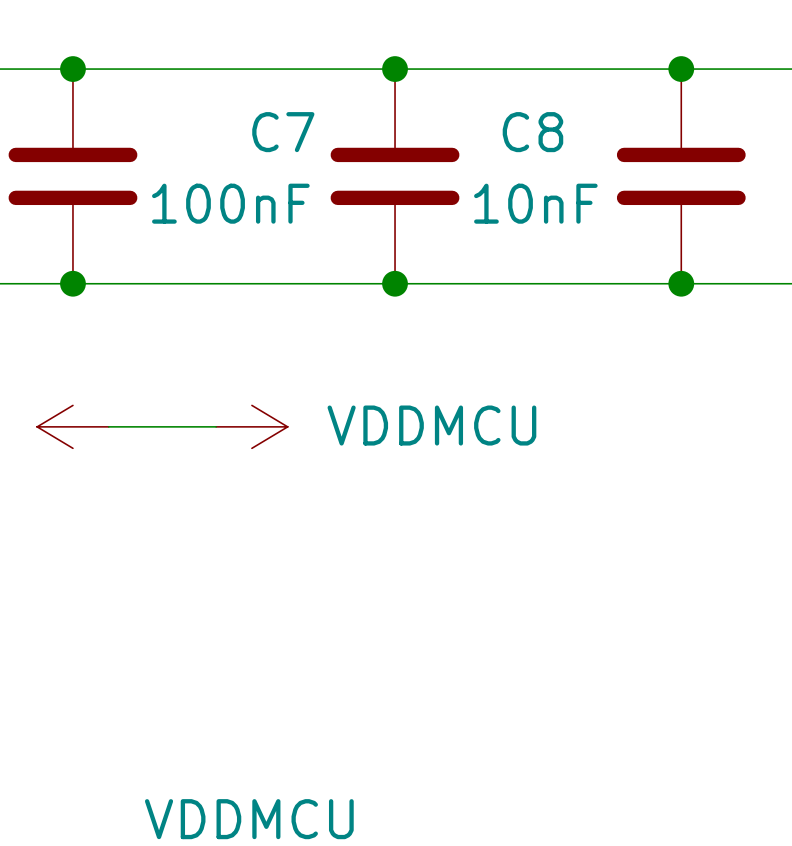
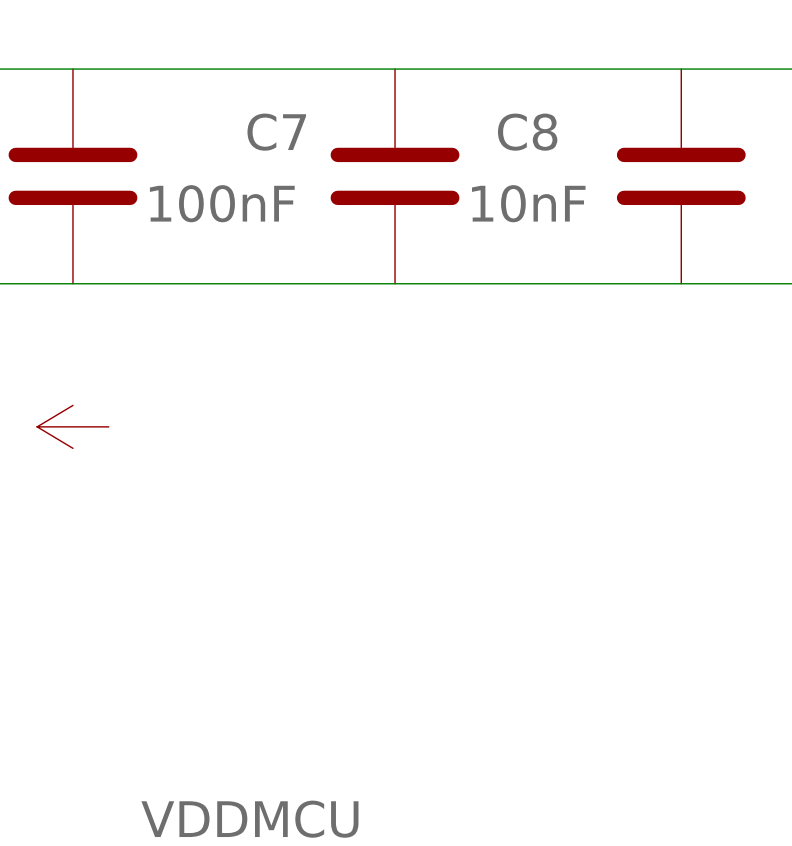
junction: (72, 69) -> none
junction: (395, 69) -> none
junction: (681, 69) -> none
junction: (72, 283) -> none
junction: (395, 283) -> none
junction: (681, 283) -> none
wire: (108, 426) (216, 426) -> none
power symbol: VDDMCU (251, 426) -> none

